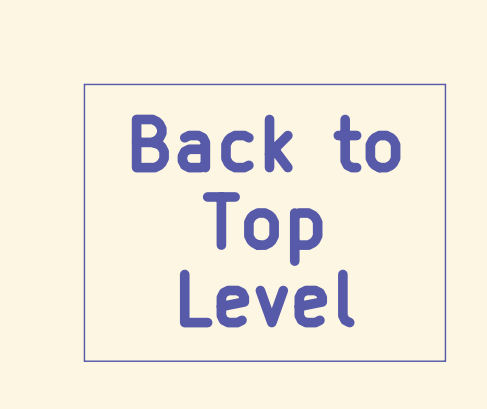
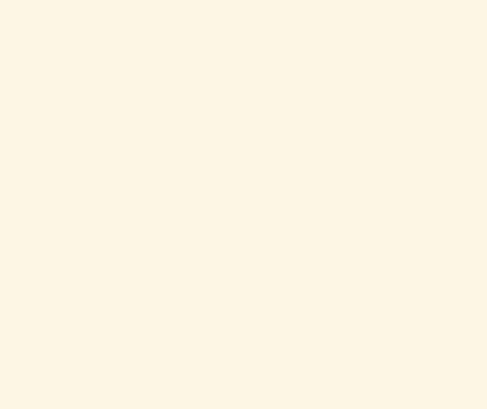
line: (84, 84) (445, 84) (445, 361) (84, 361) (84, 84) -> none
text: Back to (266, 143) -> none
text: Top (262, 229) -> none
text: Level (267, 298) -> none

